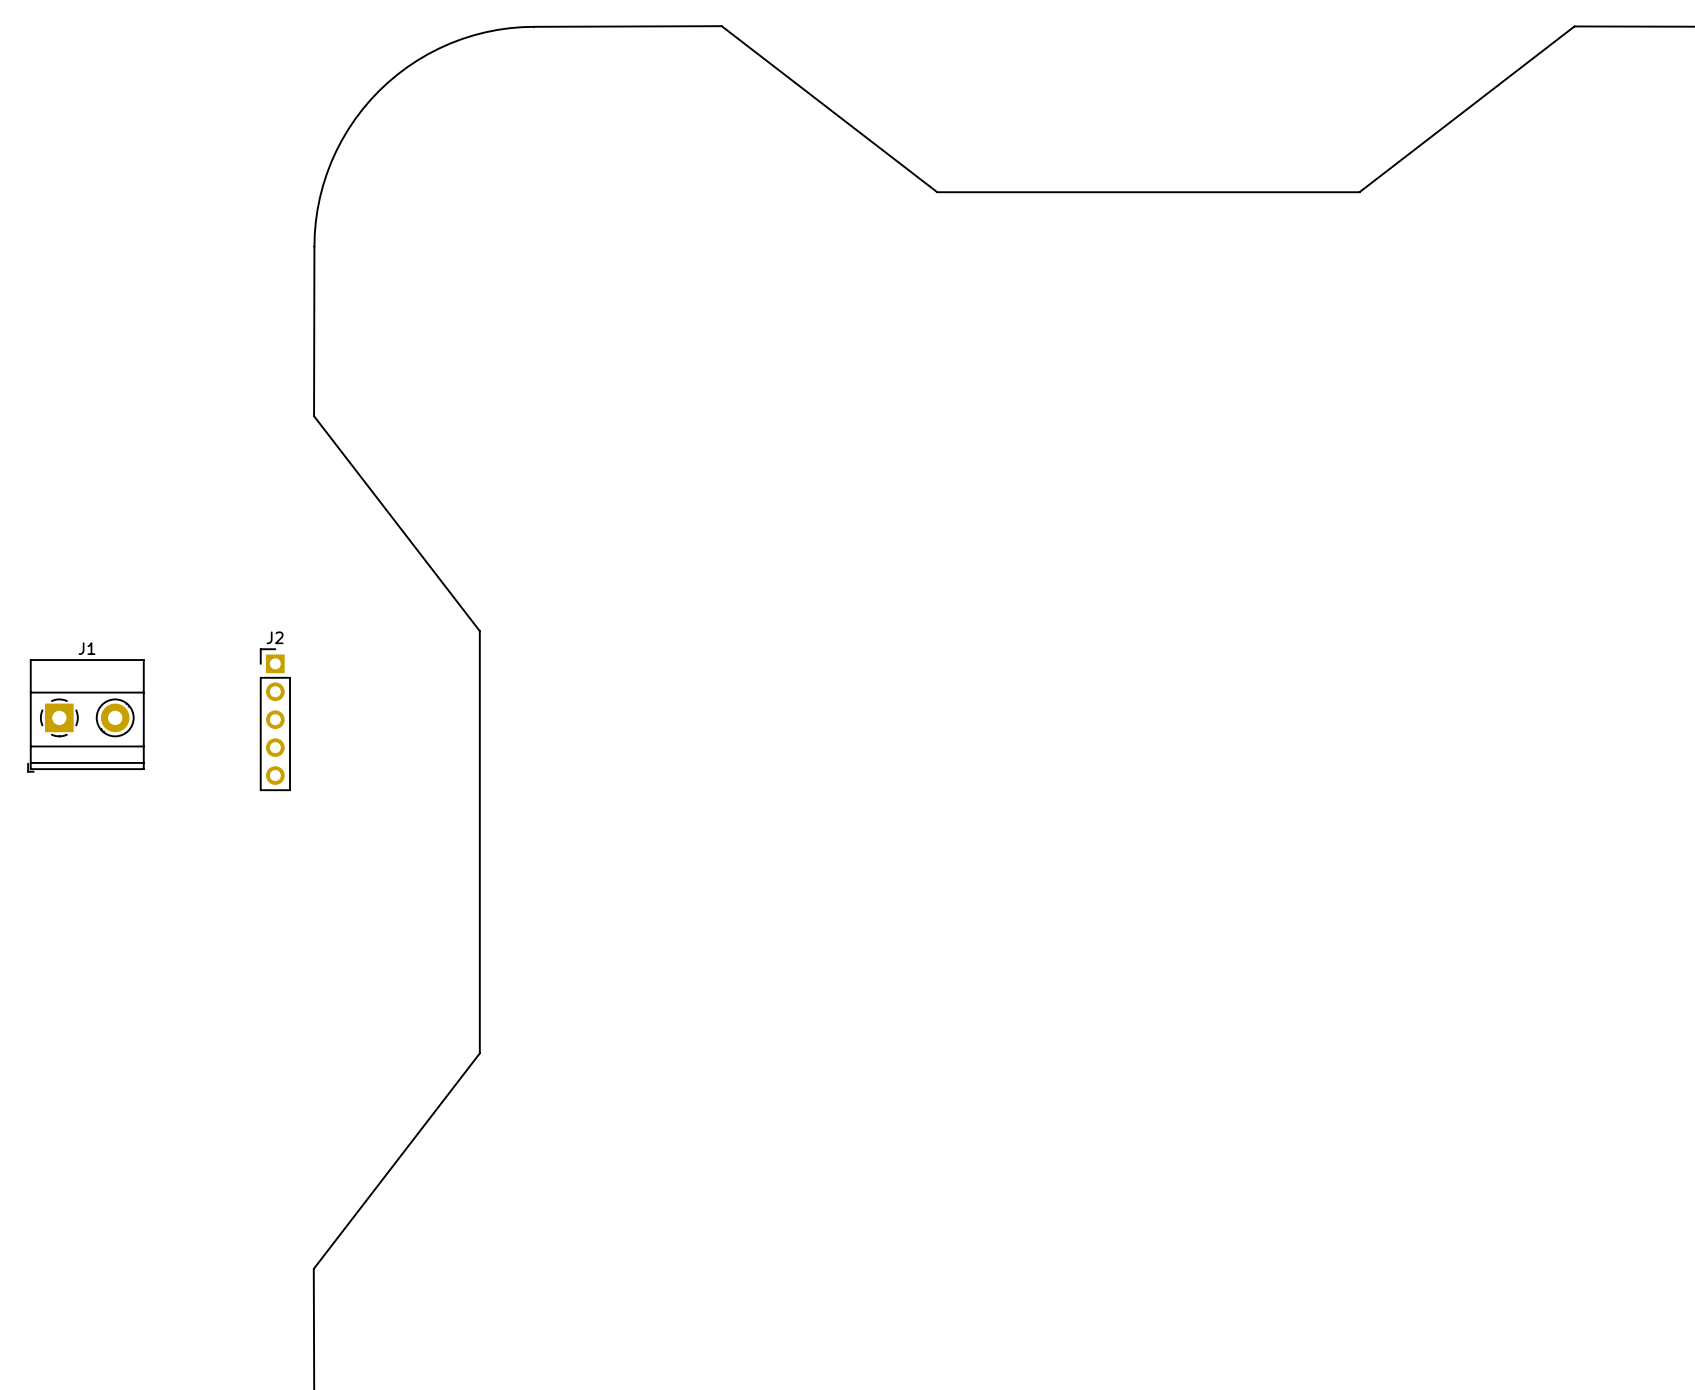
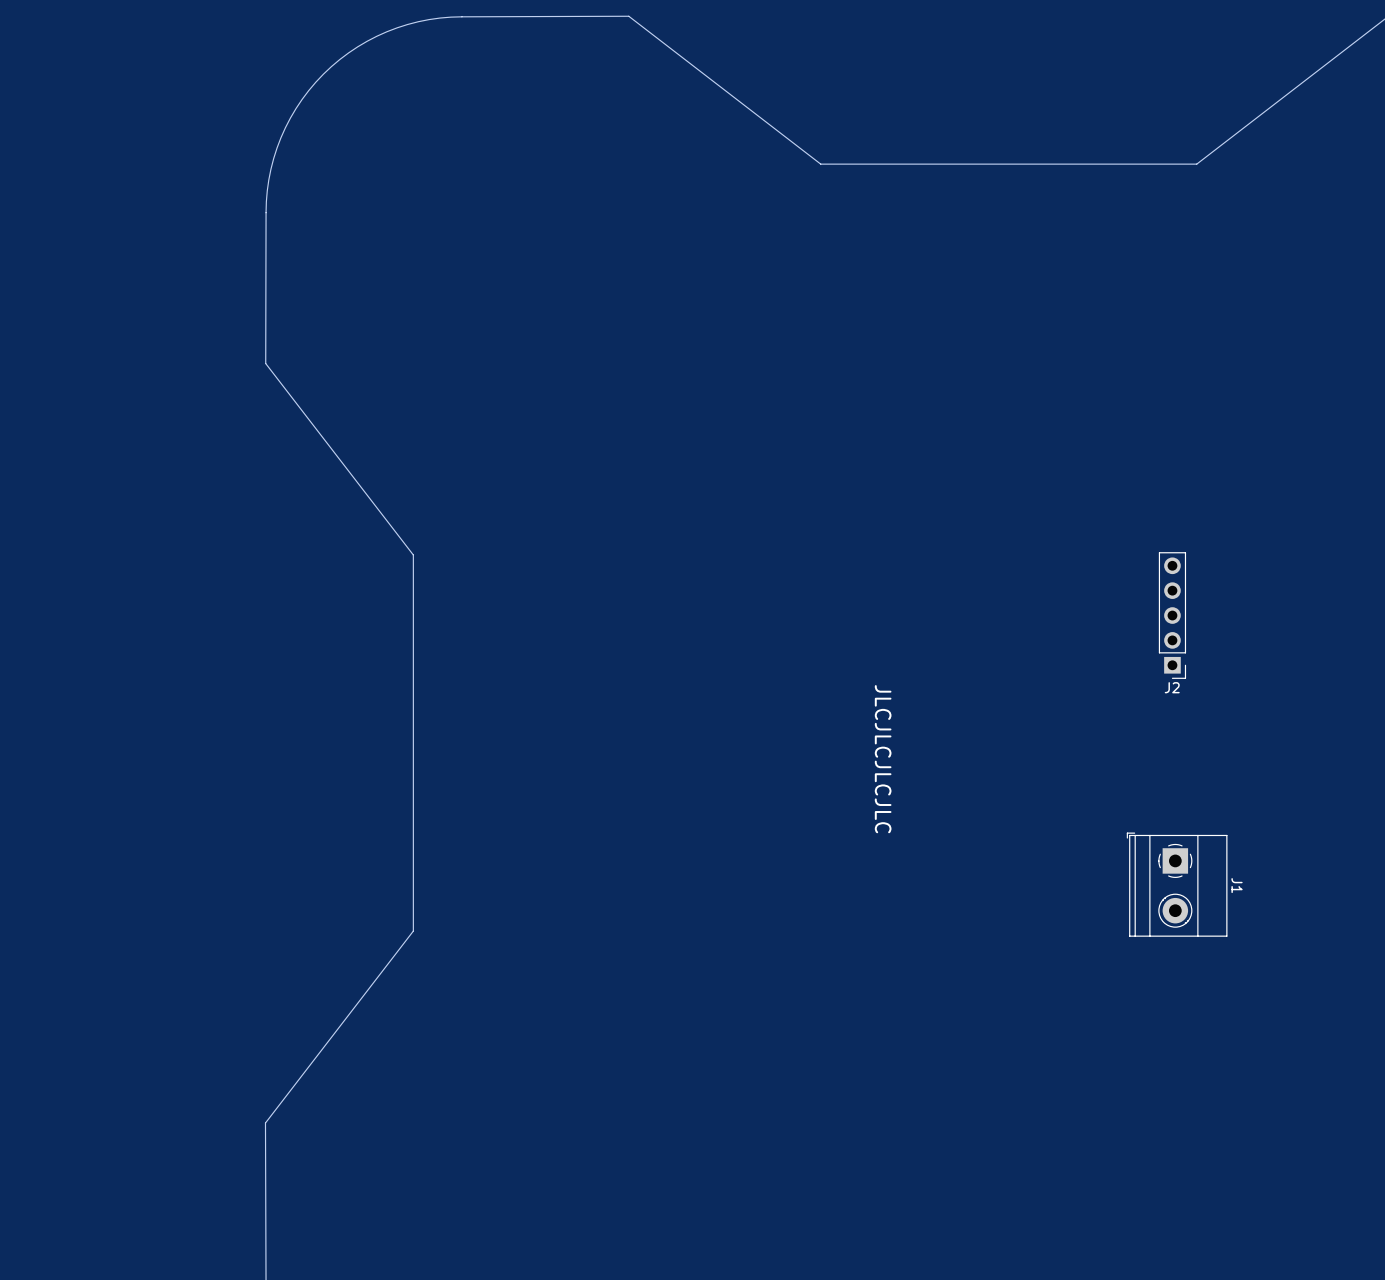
J1 rotation: 0° (85, 715) -> 90° clockwise (1177, 884)
J1 position: (85, 715) -> (1177, 884)
J2 rotation: 0° (275, 719) -> 180° (1172, 615)
J2 position: (275, 719) -> (1172, 615)
text: none -> JLCJLCJLCJLC (883, 759)

